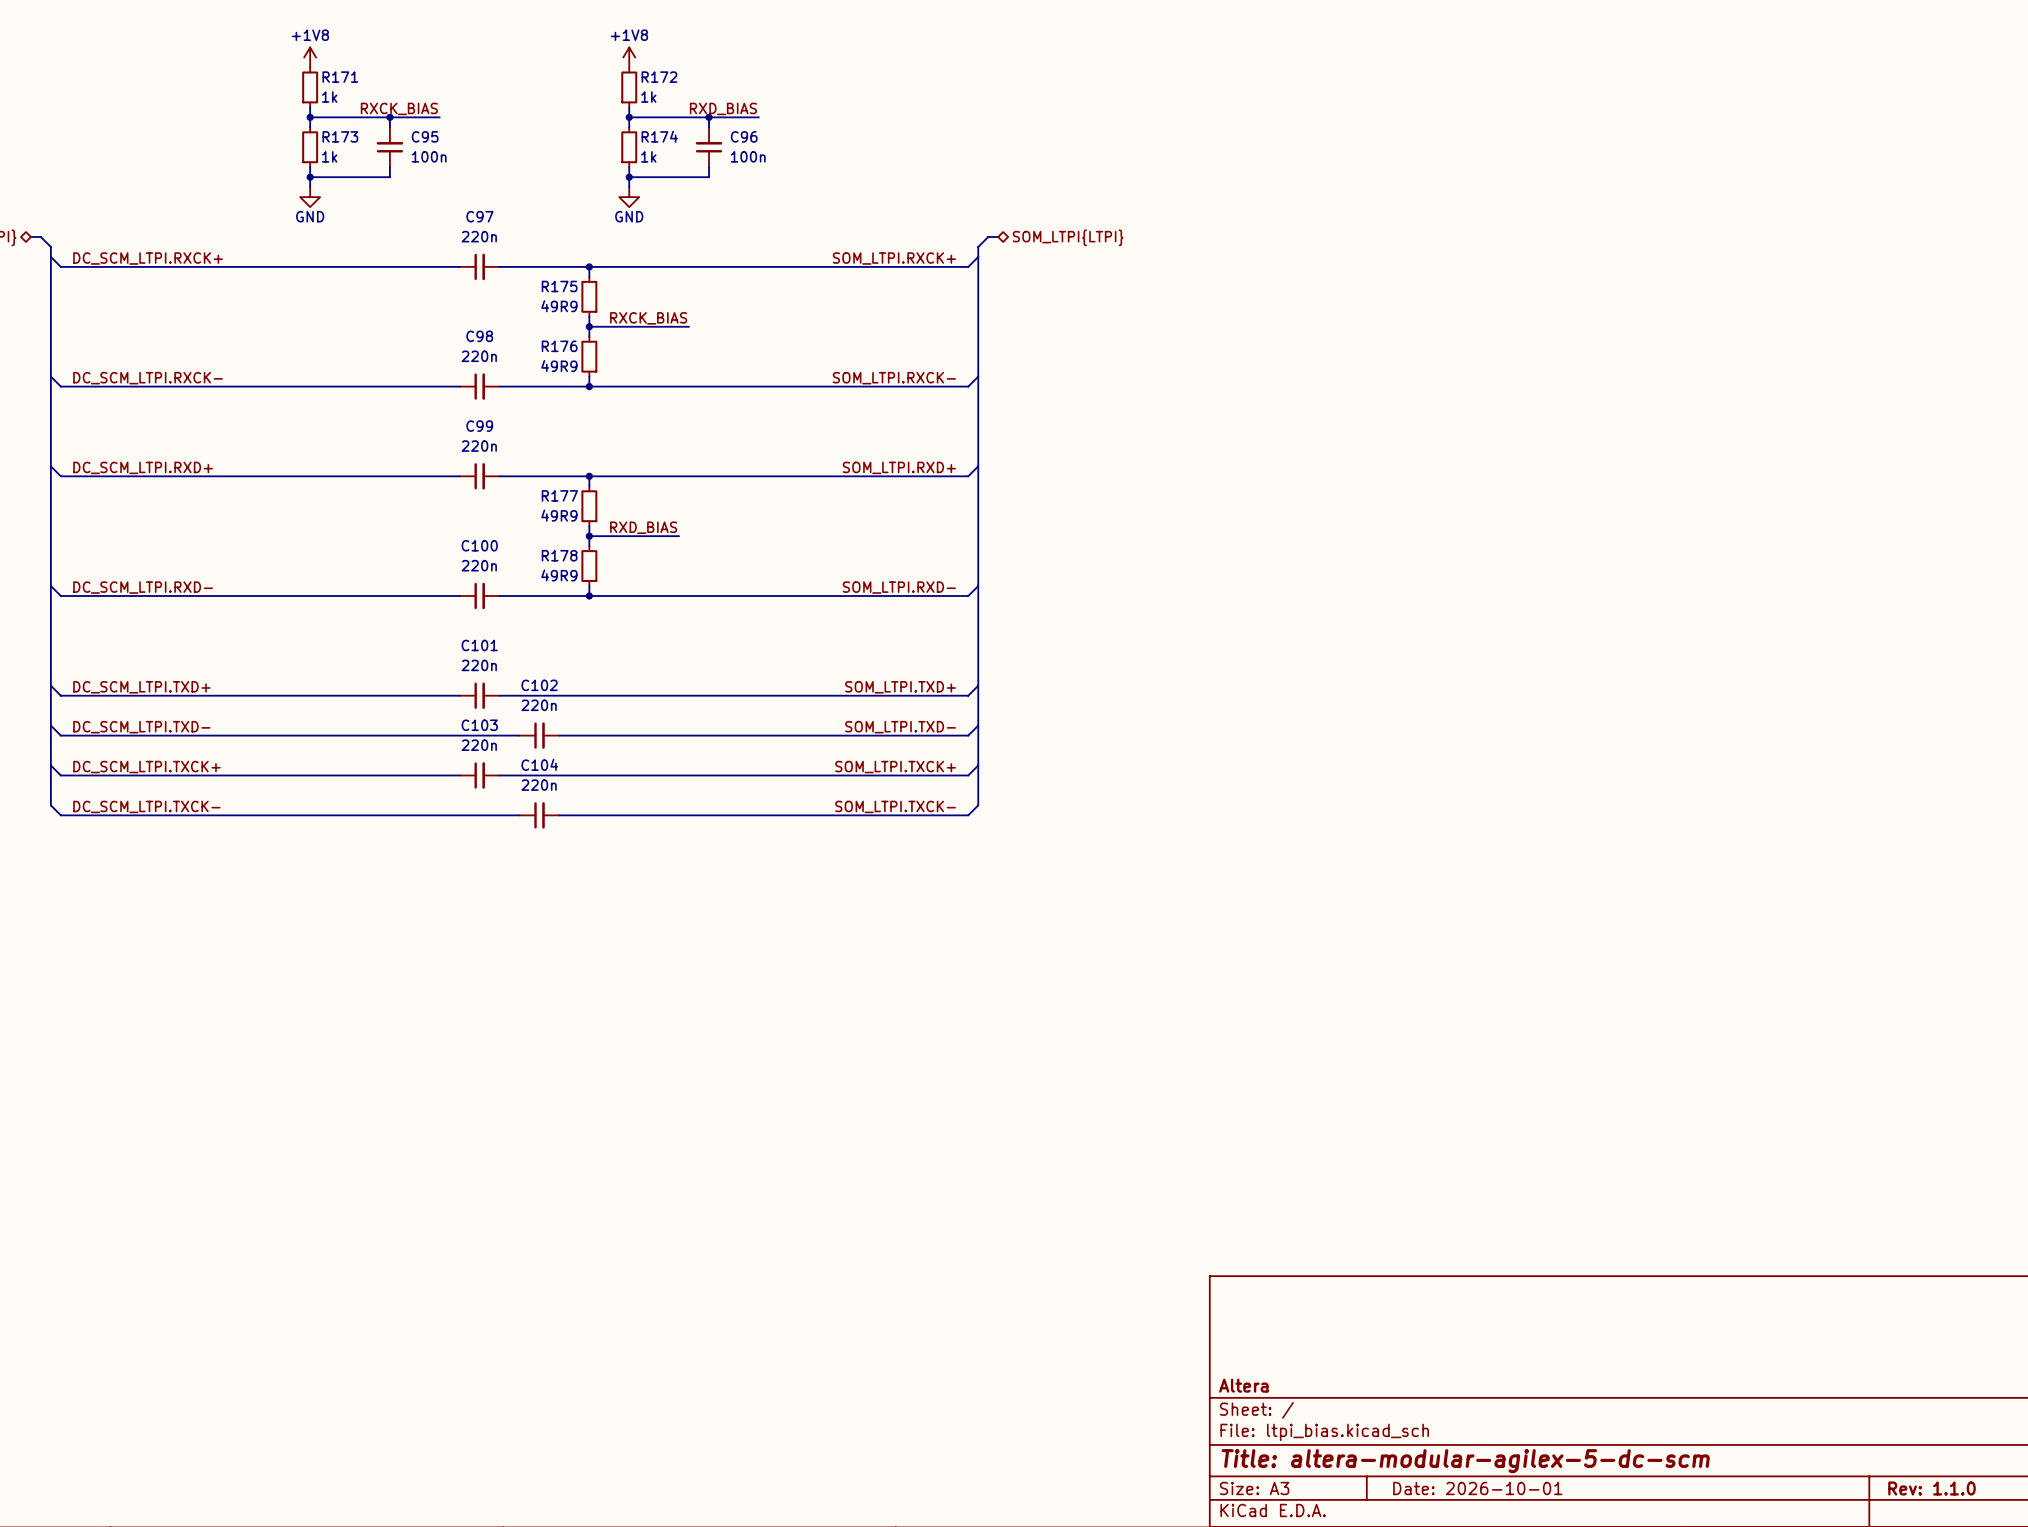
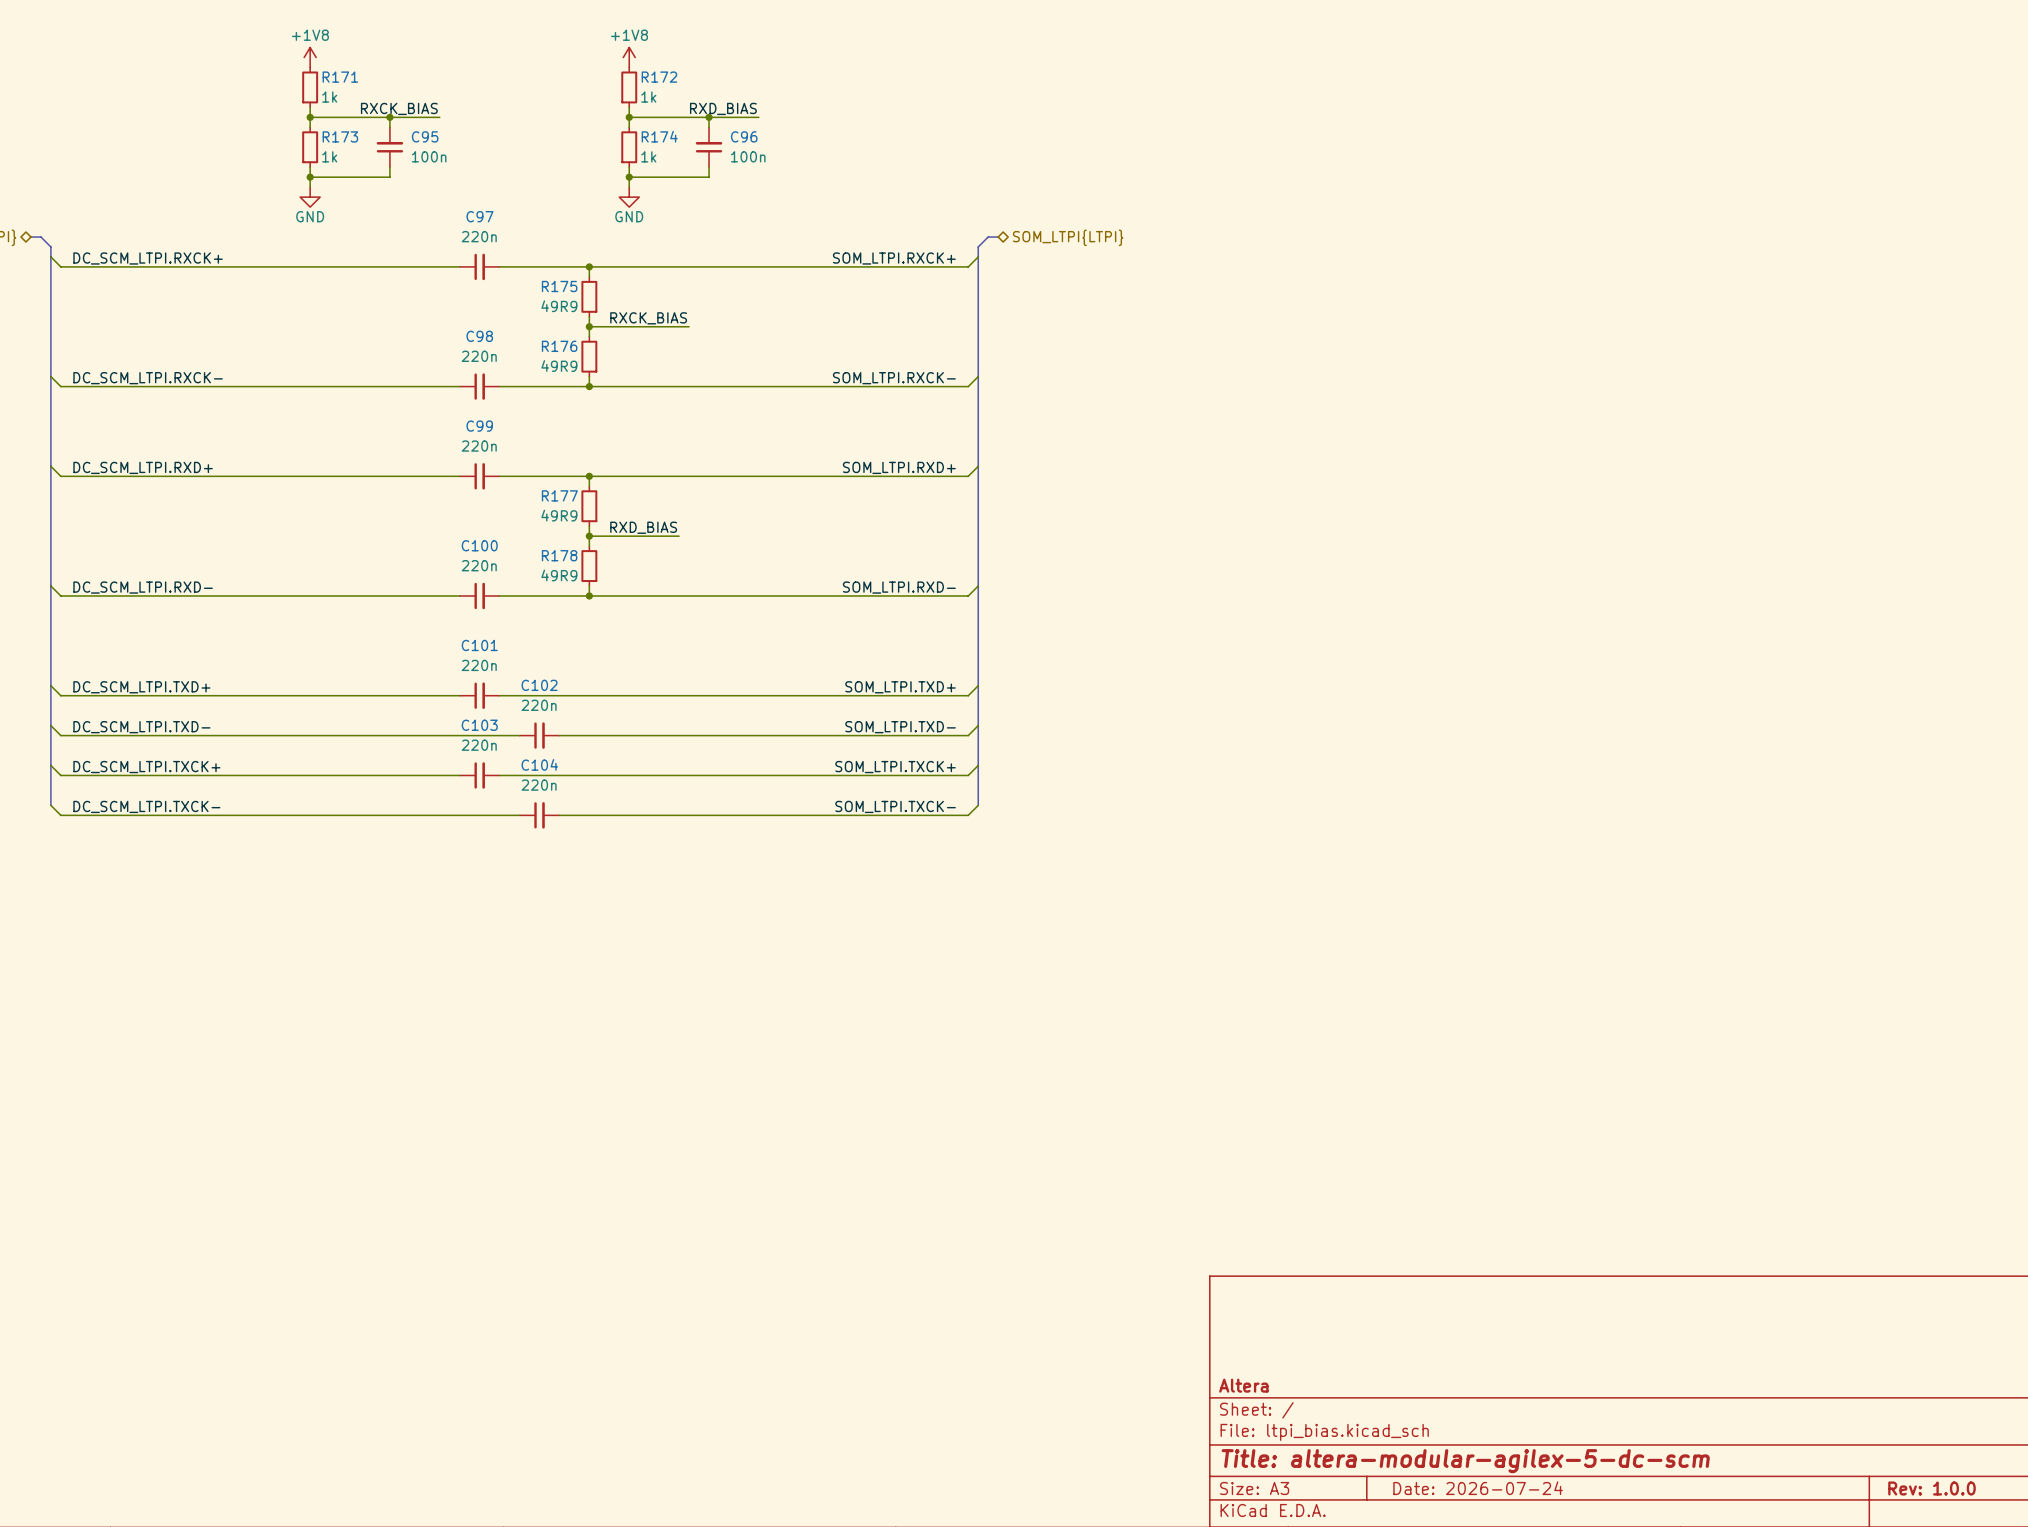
title block: Date: 2026-10-01 (1477, 1488) -> Date: 2026-07-24 (1478, 1488)
title block: Rev: 1.1.0 (1931, 1488) -> Rev: 1.0.0 (1931, 1488)

